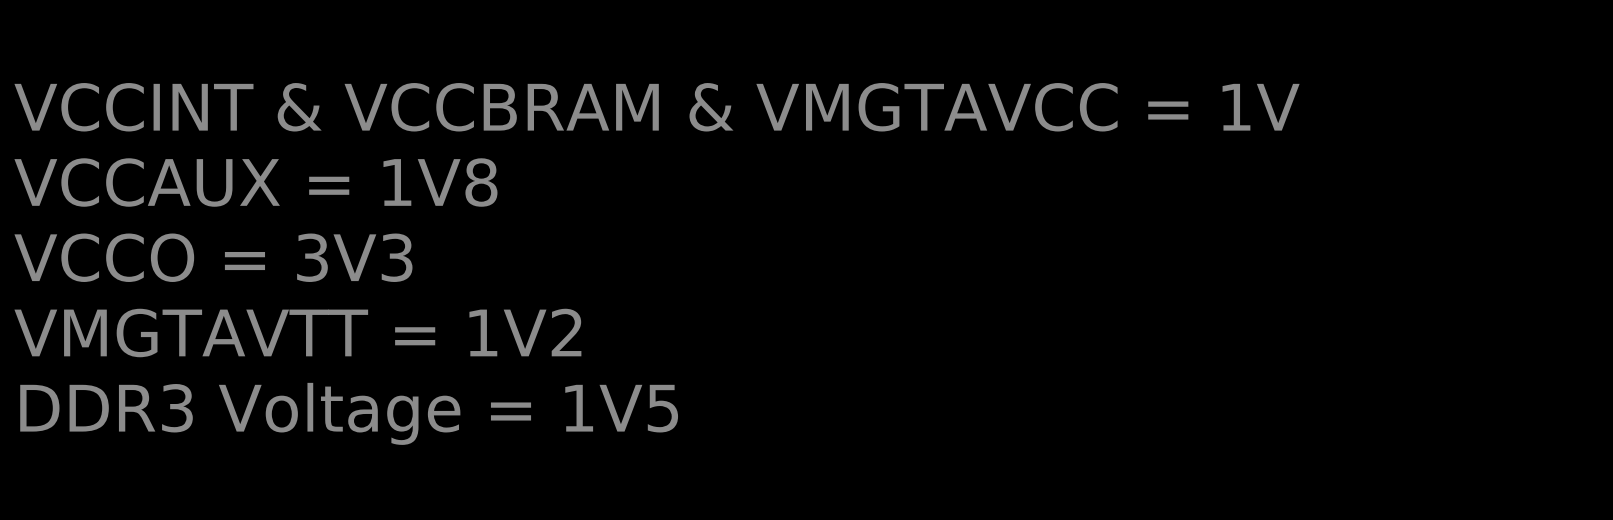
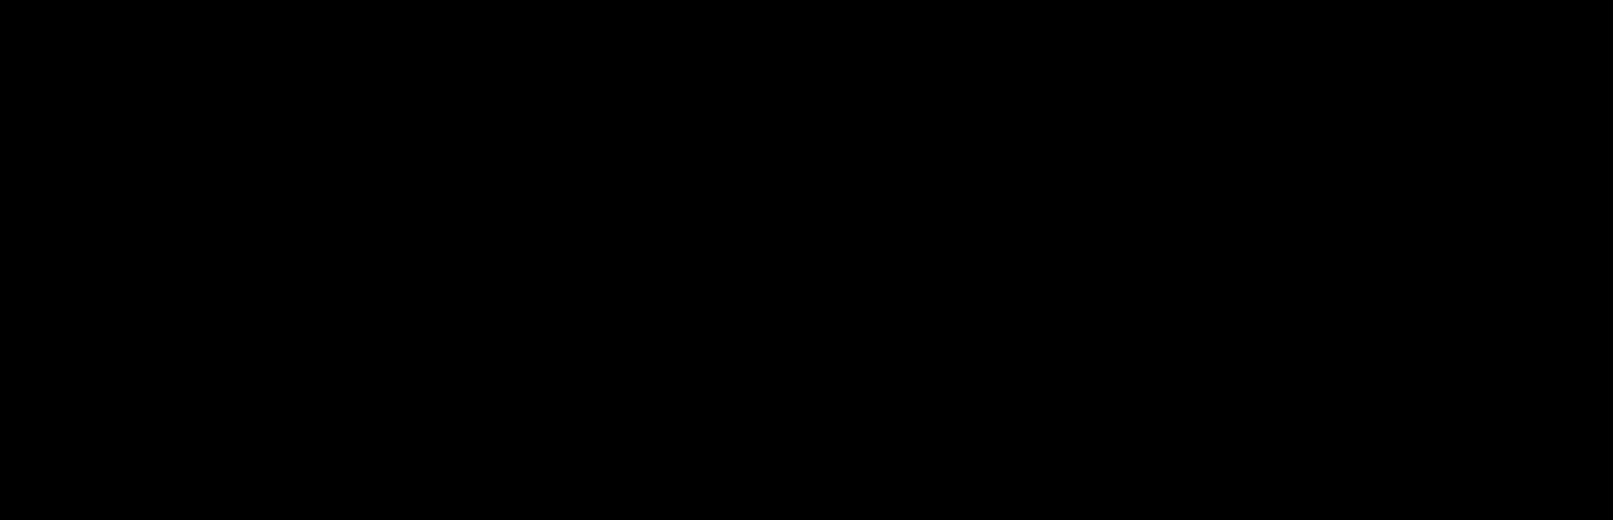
text: VCCINT & VCCBRAM & VMGTAVCC = 1V (657, 107) -> none
text: VCCAUX = 1V8 (255, 182) -> none
text: VCCO = 3V3 (213, 257) -> none
text: VMGTAVTT = 1V2 (297, 333) -> none
text: DDR3 Voltage = 1V5 (349, 413) -> none

